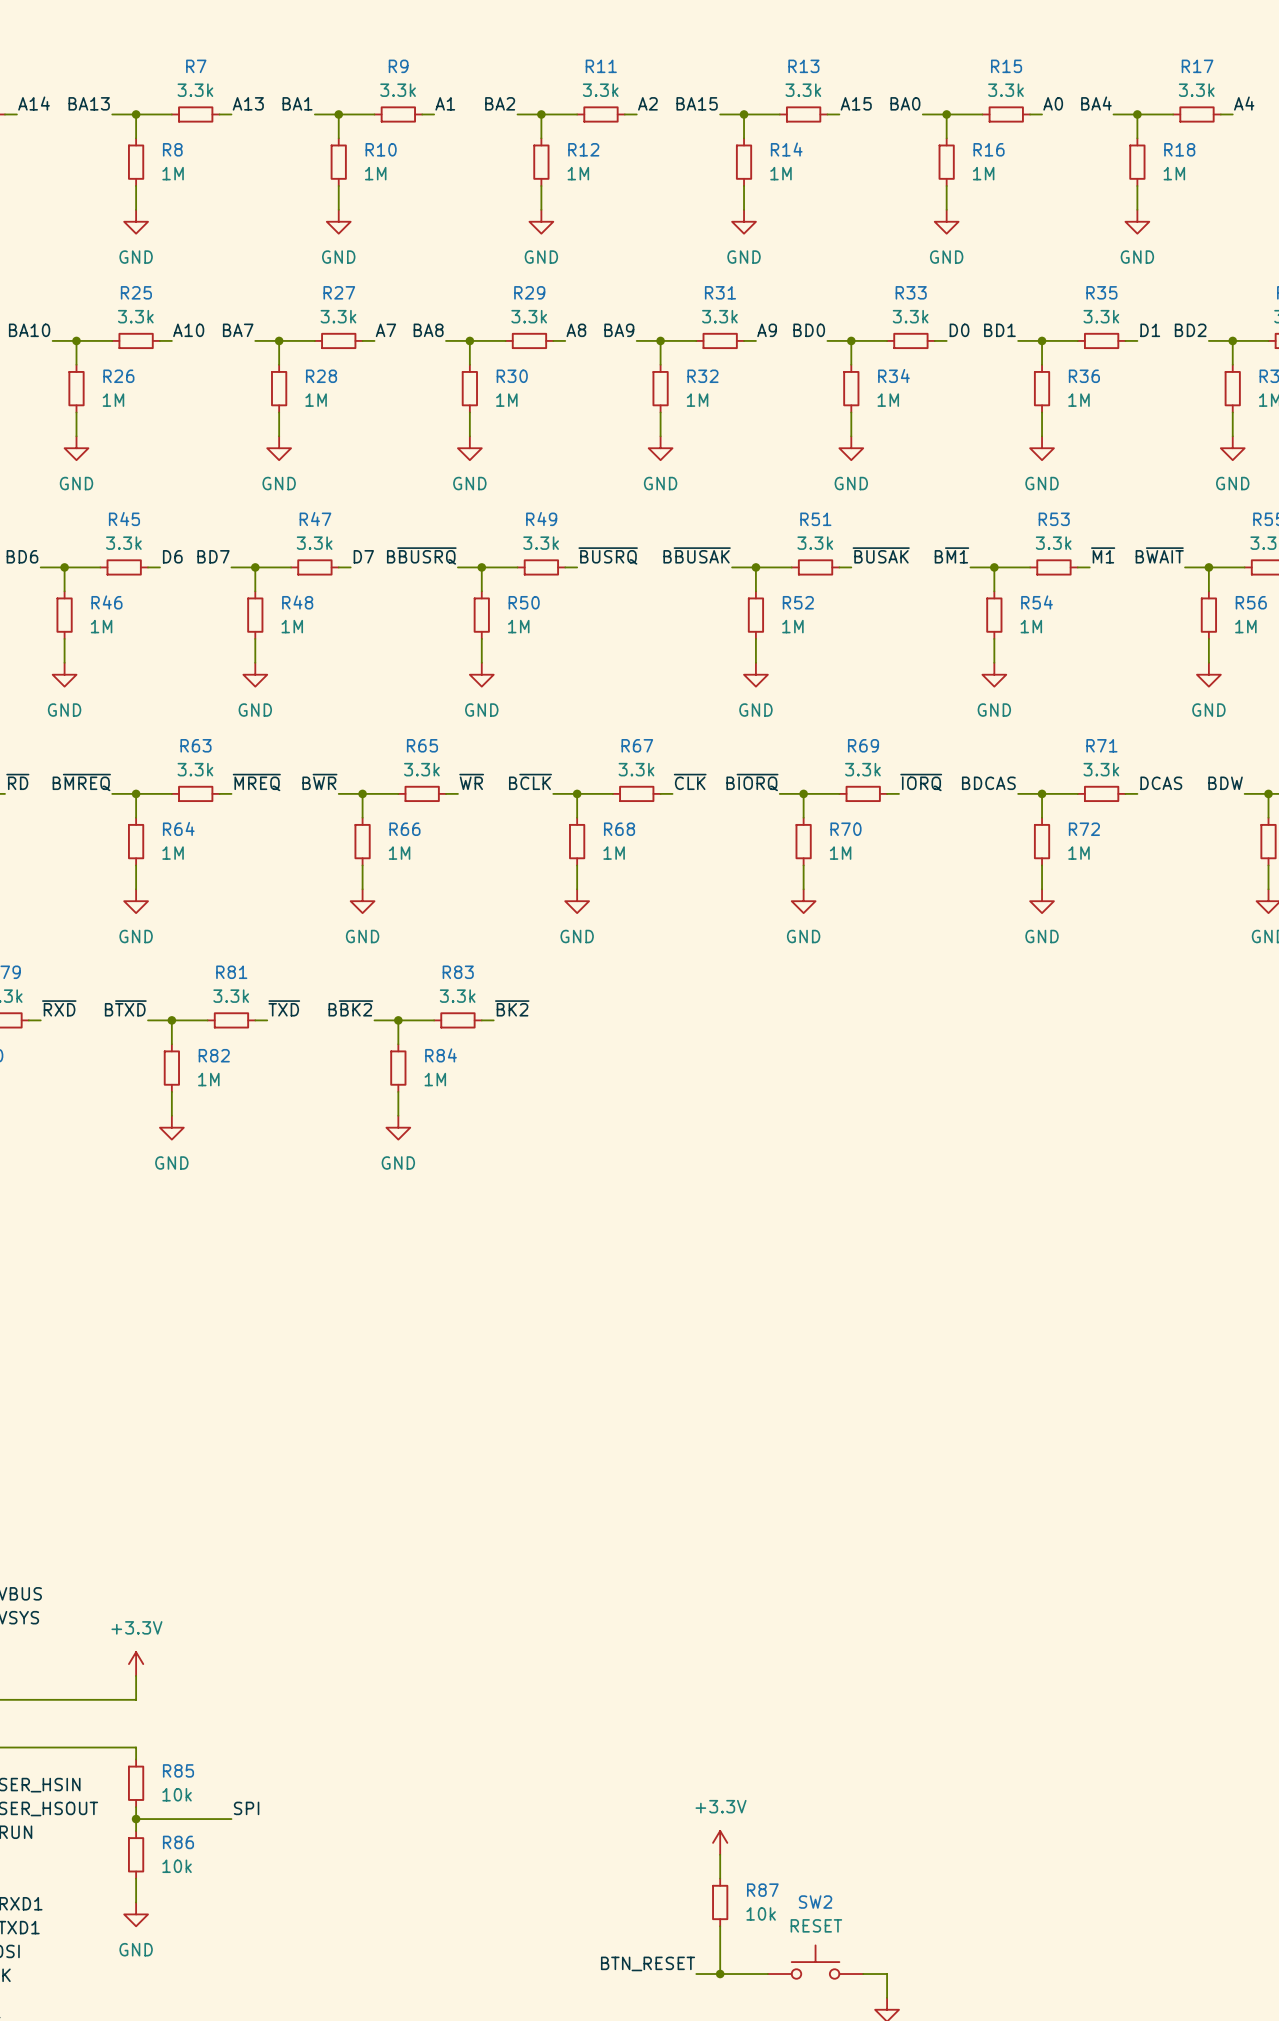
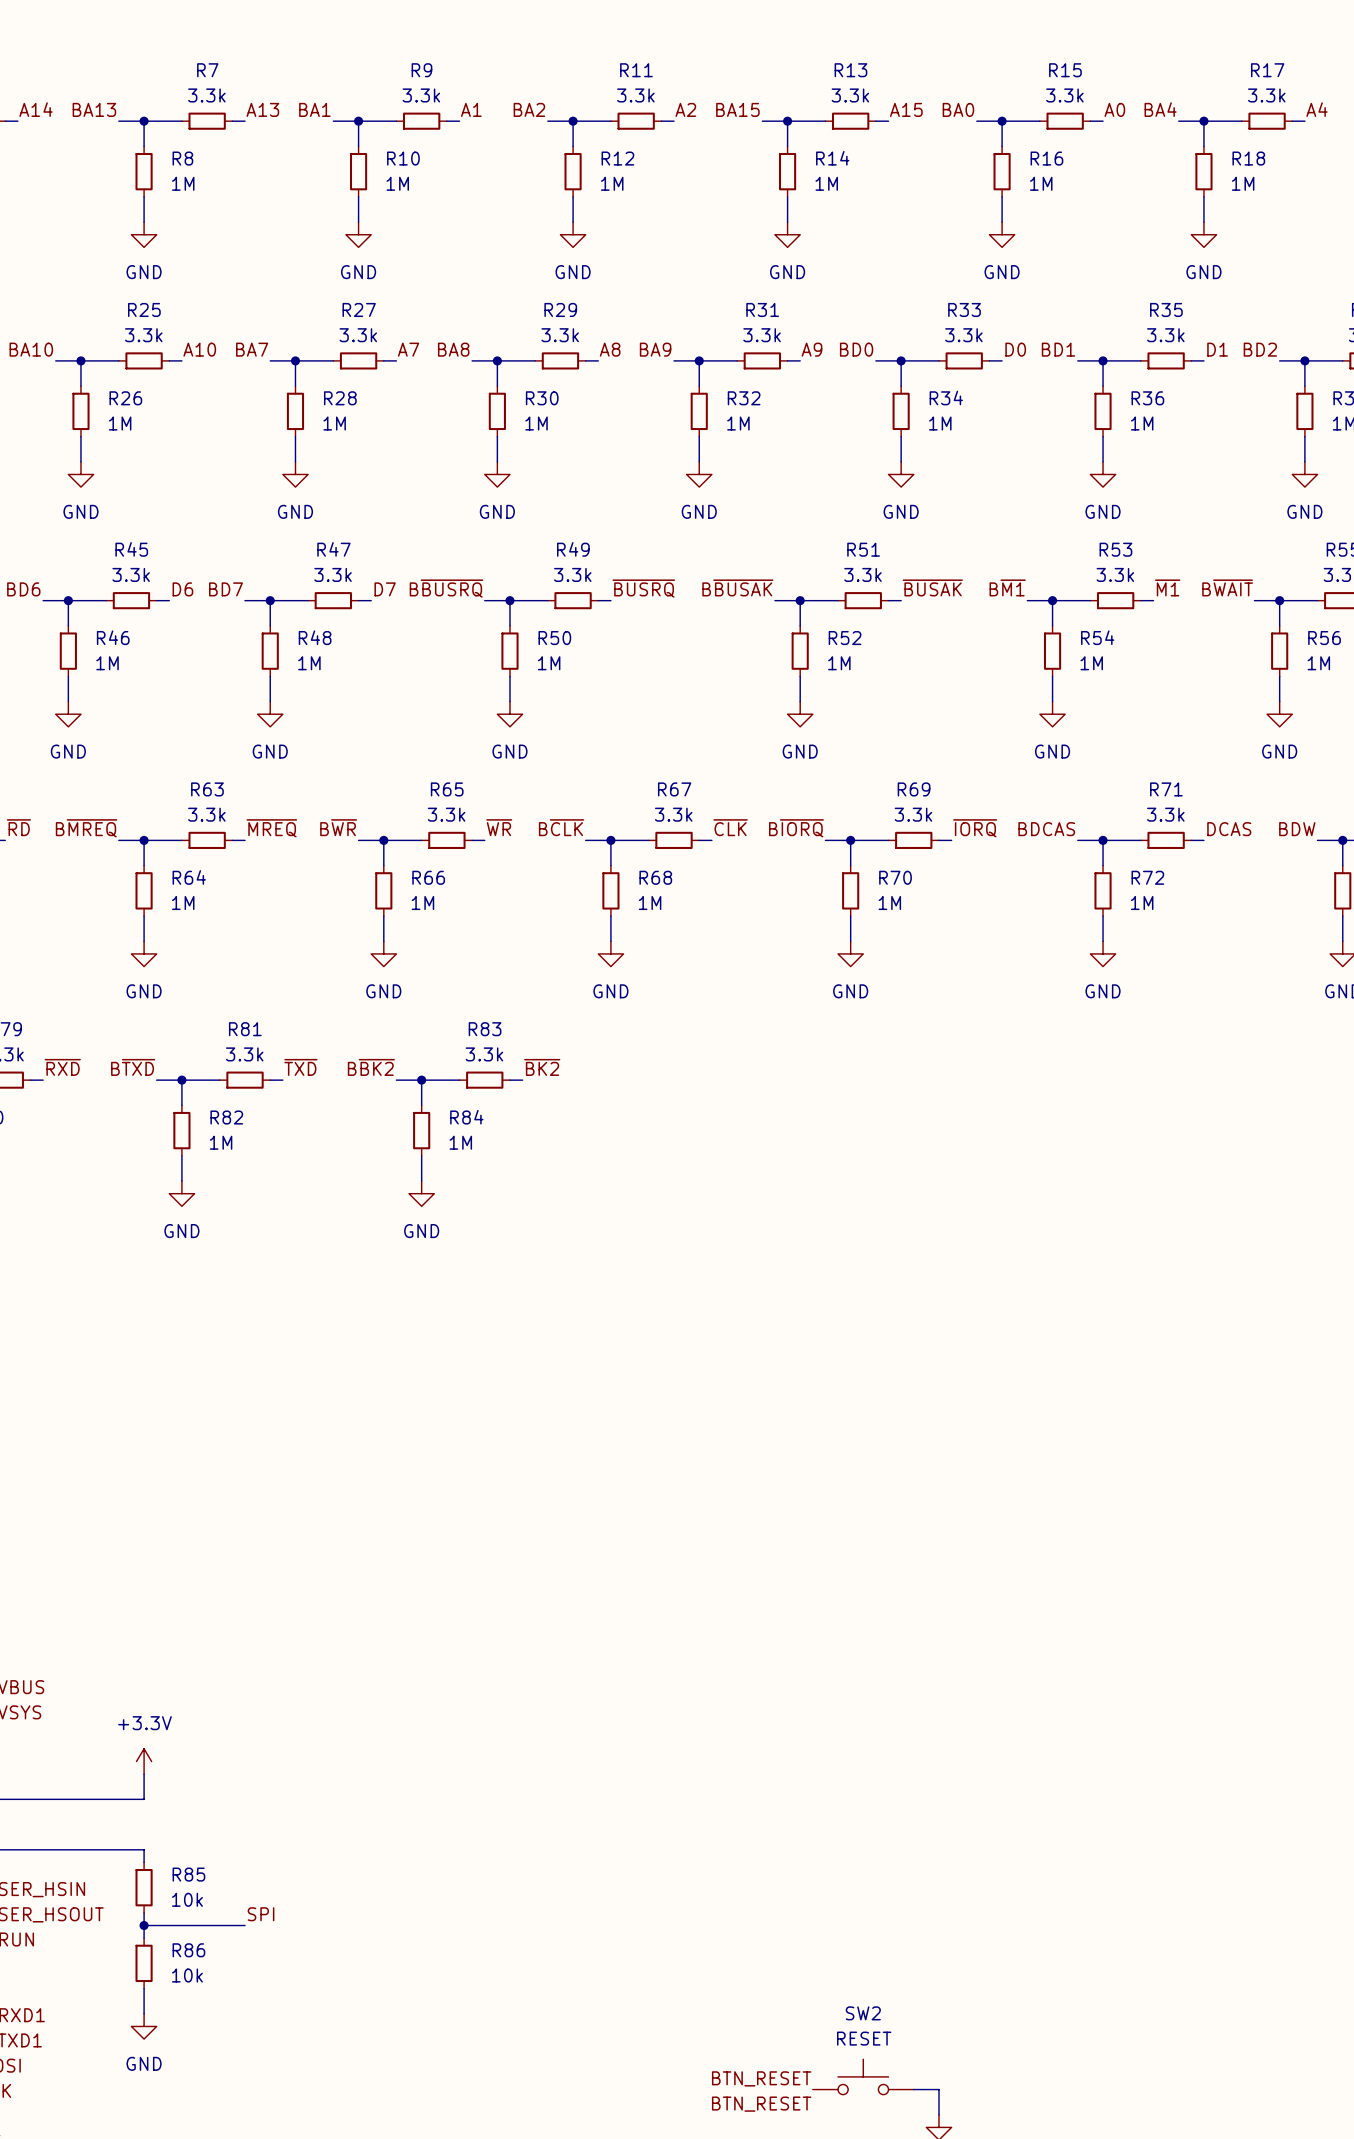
power symbol: +3.3V (720, 1842) -> none
wire: (720, 1854) (720, 1878) -> none
R87: 10k (720, 1902) -> none
wire: (720, 1926) (720, 1974) -> none
label: BTN_RESET (648, 1963) -> none
label: none -> BTN_RESET (761, 2078)
wire: (696, 1974) (767, 1974) -> none
junction: (720, 1974) -> none
label: none -> BTN_RESET (761, 2104)

